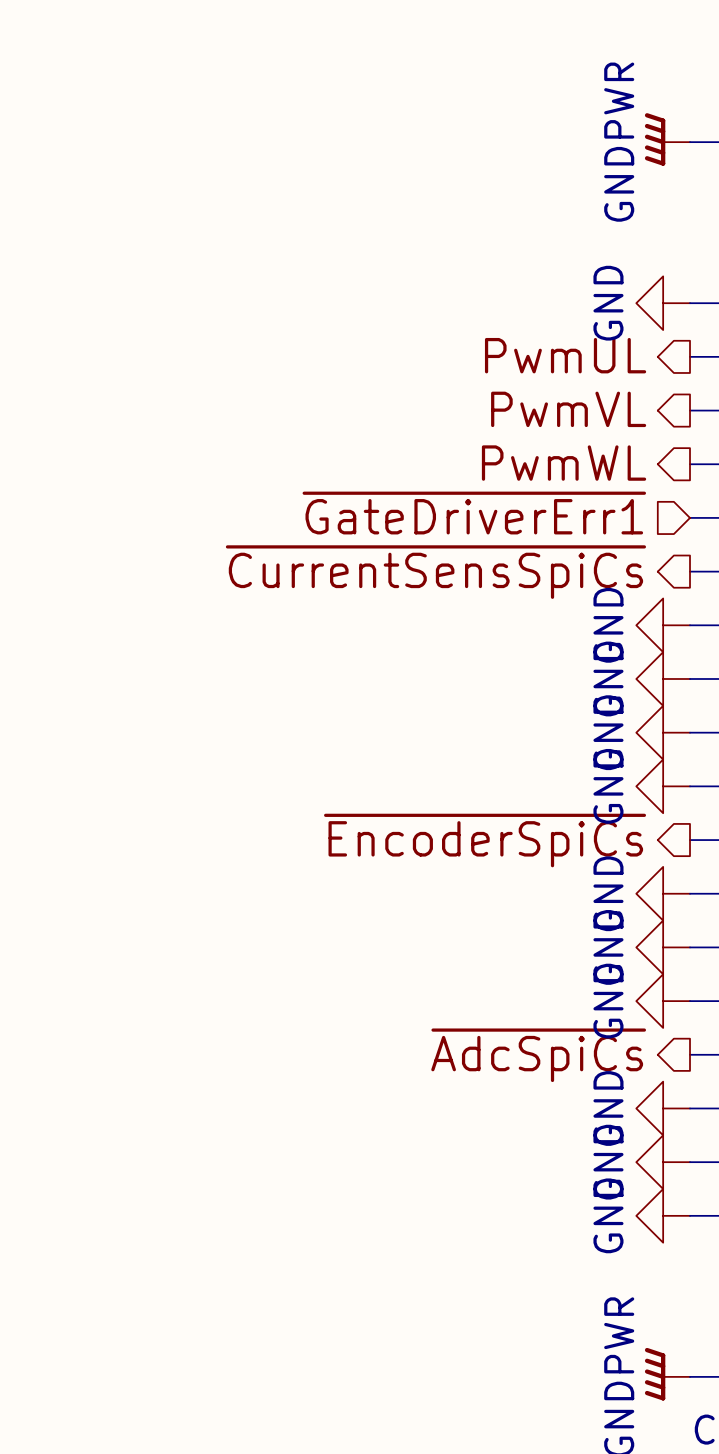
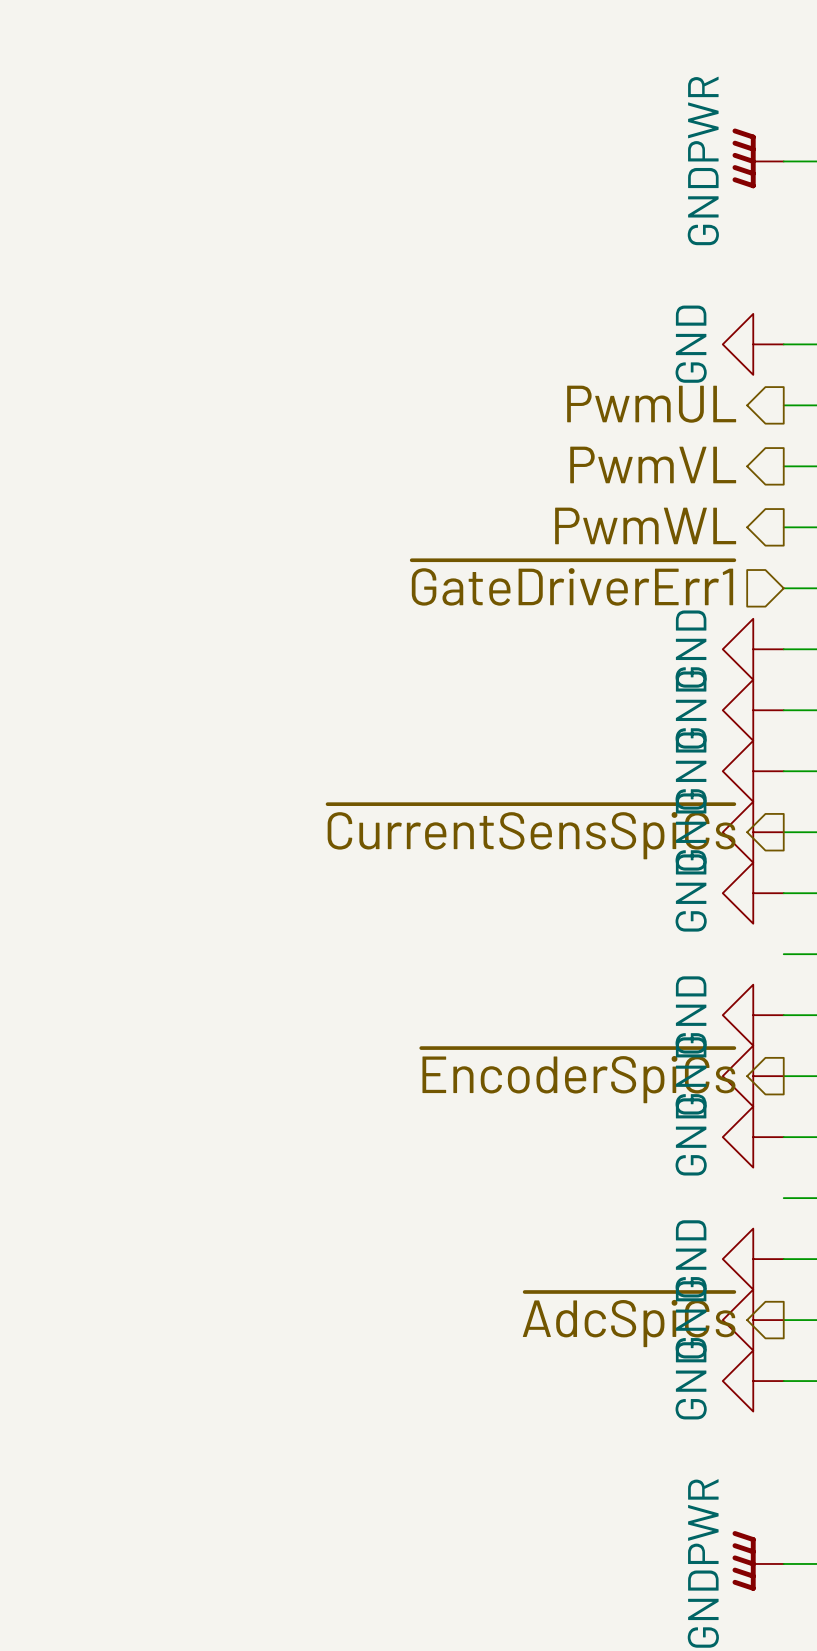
power symbol: none -> GND (753, 649)
hierarchical label position: ~{CurrentSensSpiCs} (435, 572) -> ~{CurrentSensSpiCs} (531, 831)
hierarchical label position: ~{EncoderSpiCs} (485, 840) -> ~{EncoderSpiCs} (578, 1075)
hierarchical label position: ~{AdcSpiCs} (538, 1055) -> ~{AdcSpiCs} (629, 1319)

